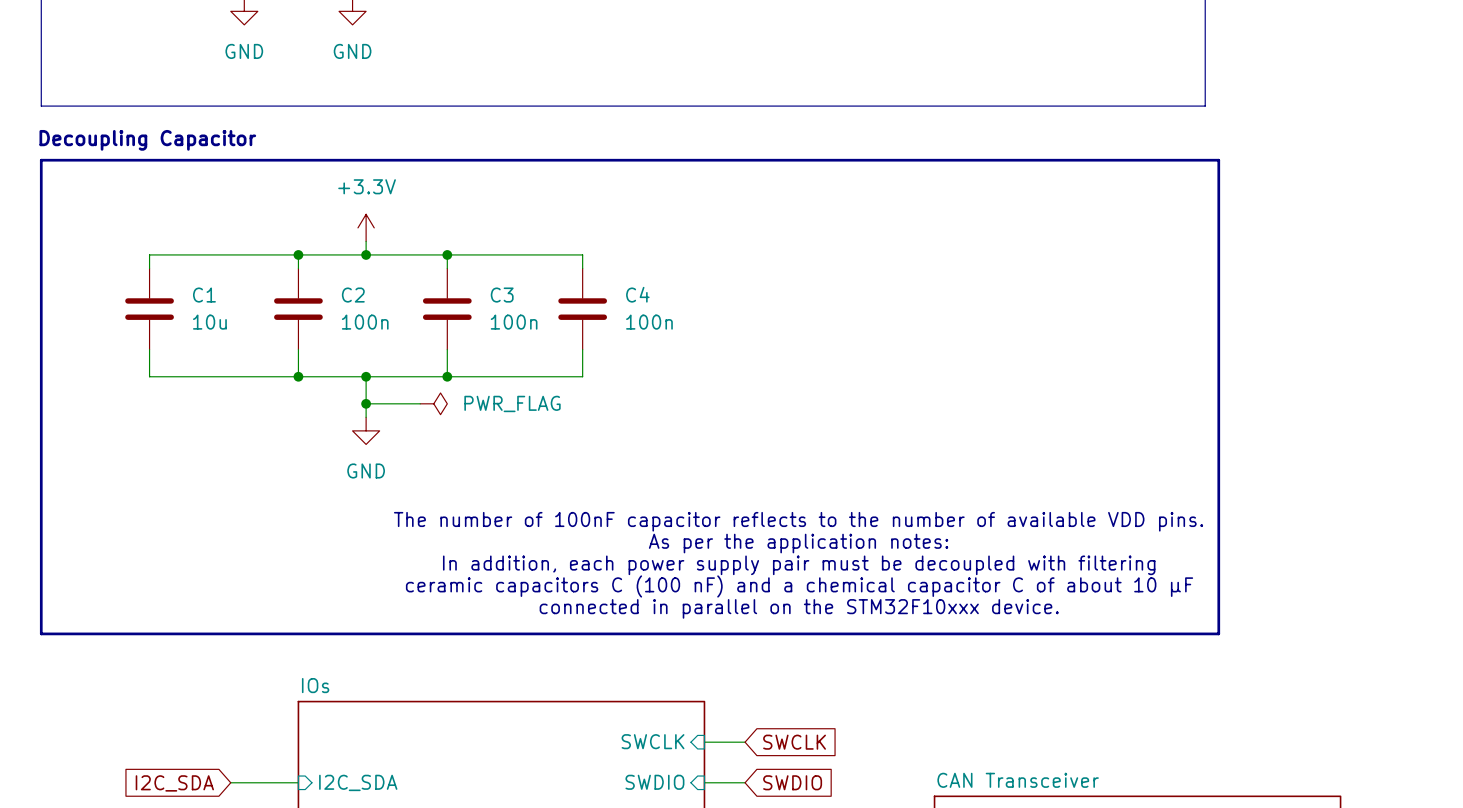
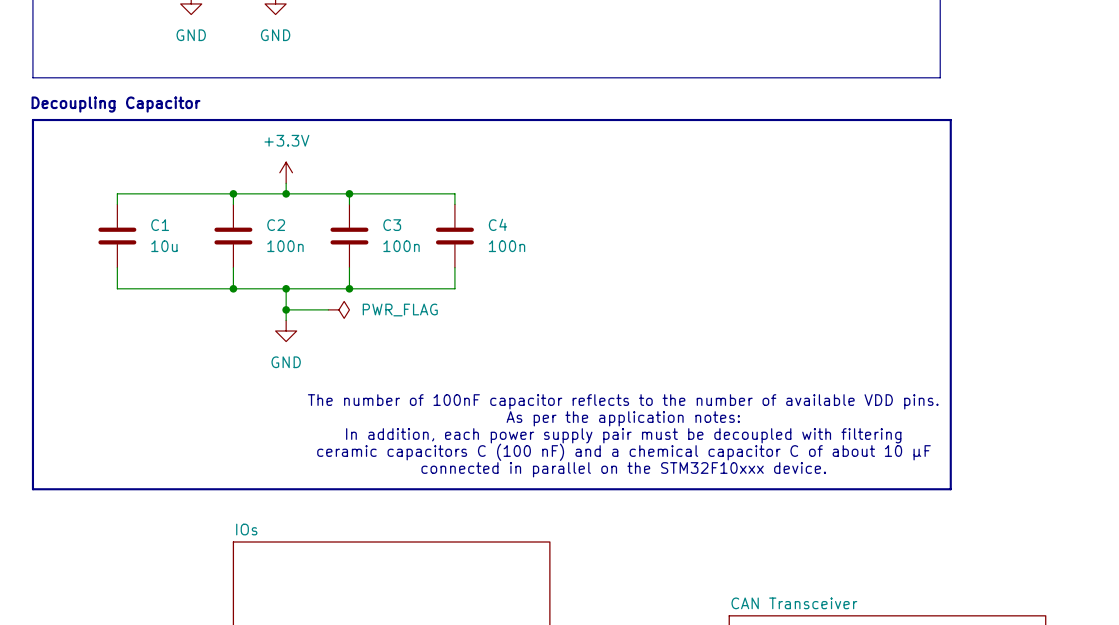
sheet pin: SWCLK (653, 741) -> none
wire: (704, 742) (745, 742) -> none
global label: SWCLK (794, 742) -> none
wire: (230, 782) (298, 782) -> none
sheet pin: I2C_SDA (358, 782) -> none
sheet pin: SWDIO (654, 782) -> none
wire: (704, 782) (745, 782) -> none
global label: SWDIO (792, 782) -> none
global label: I2C_SDA (174, 783) -> none

